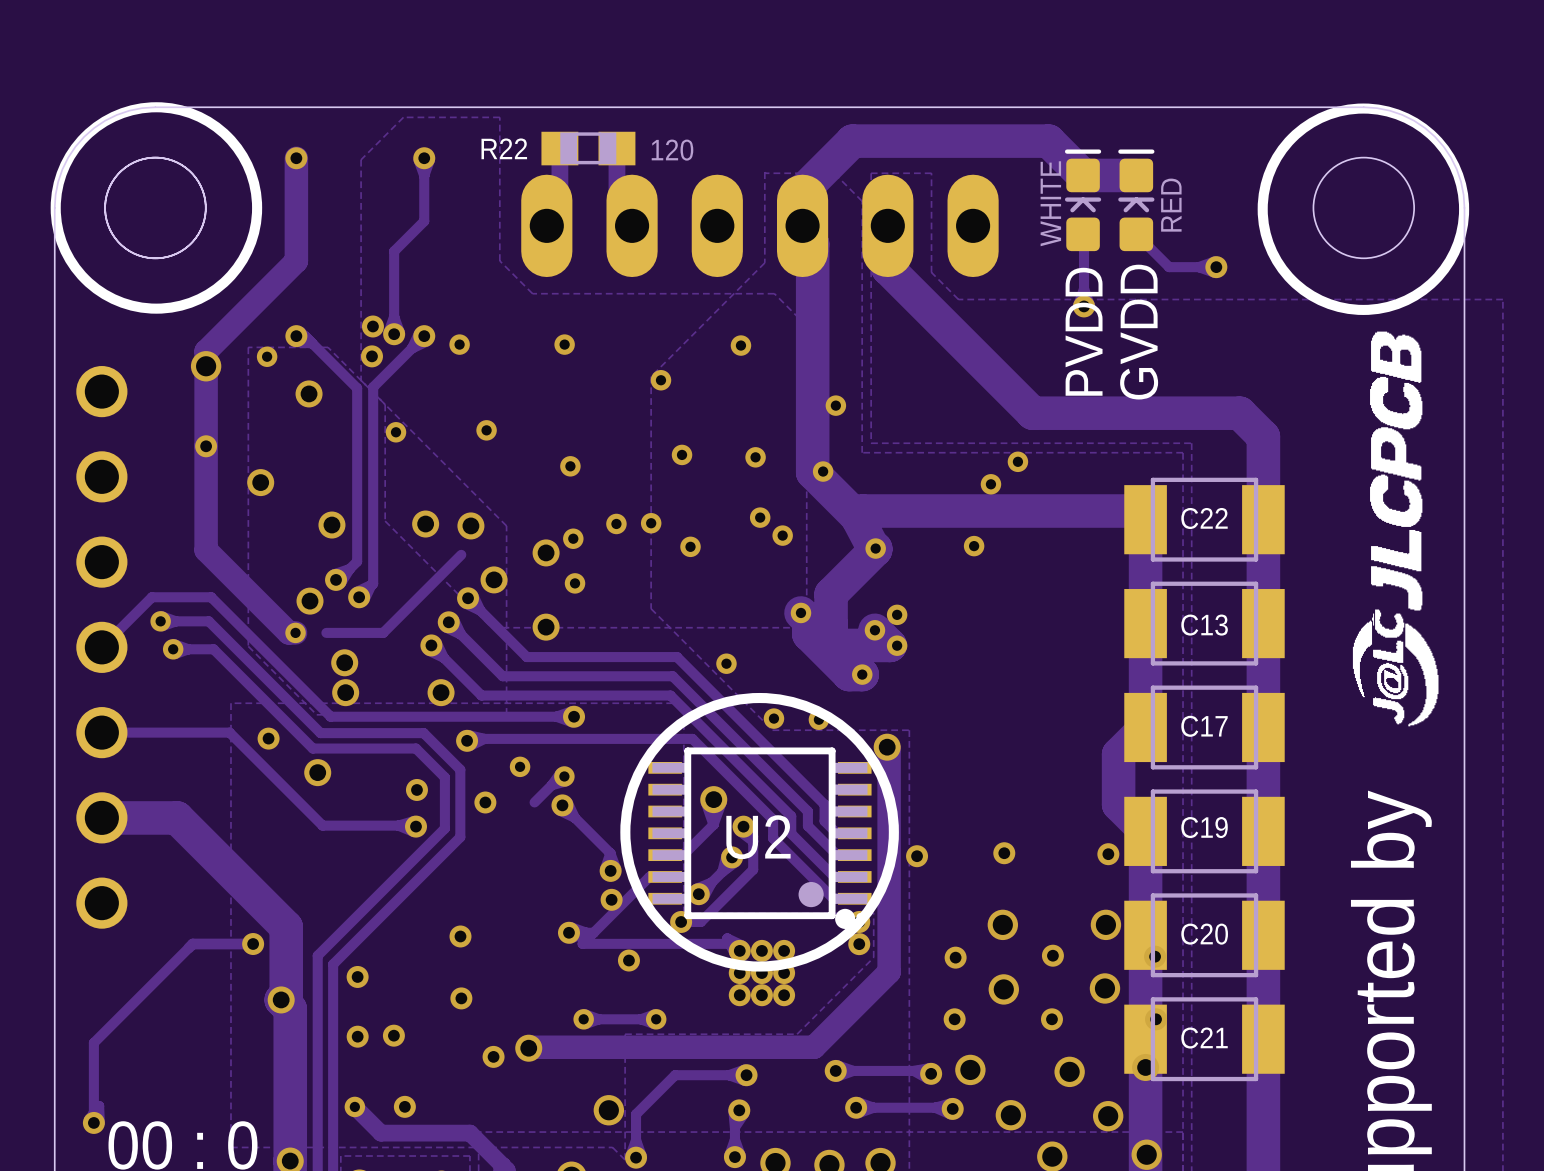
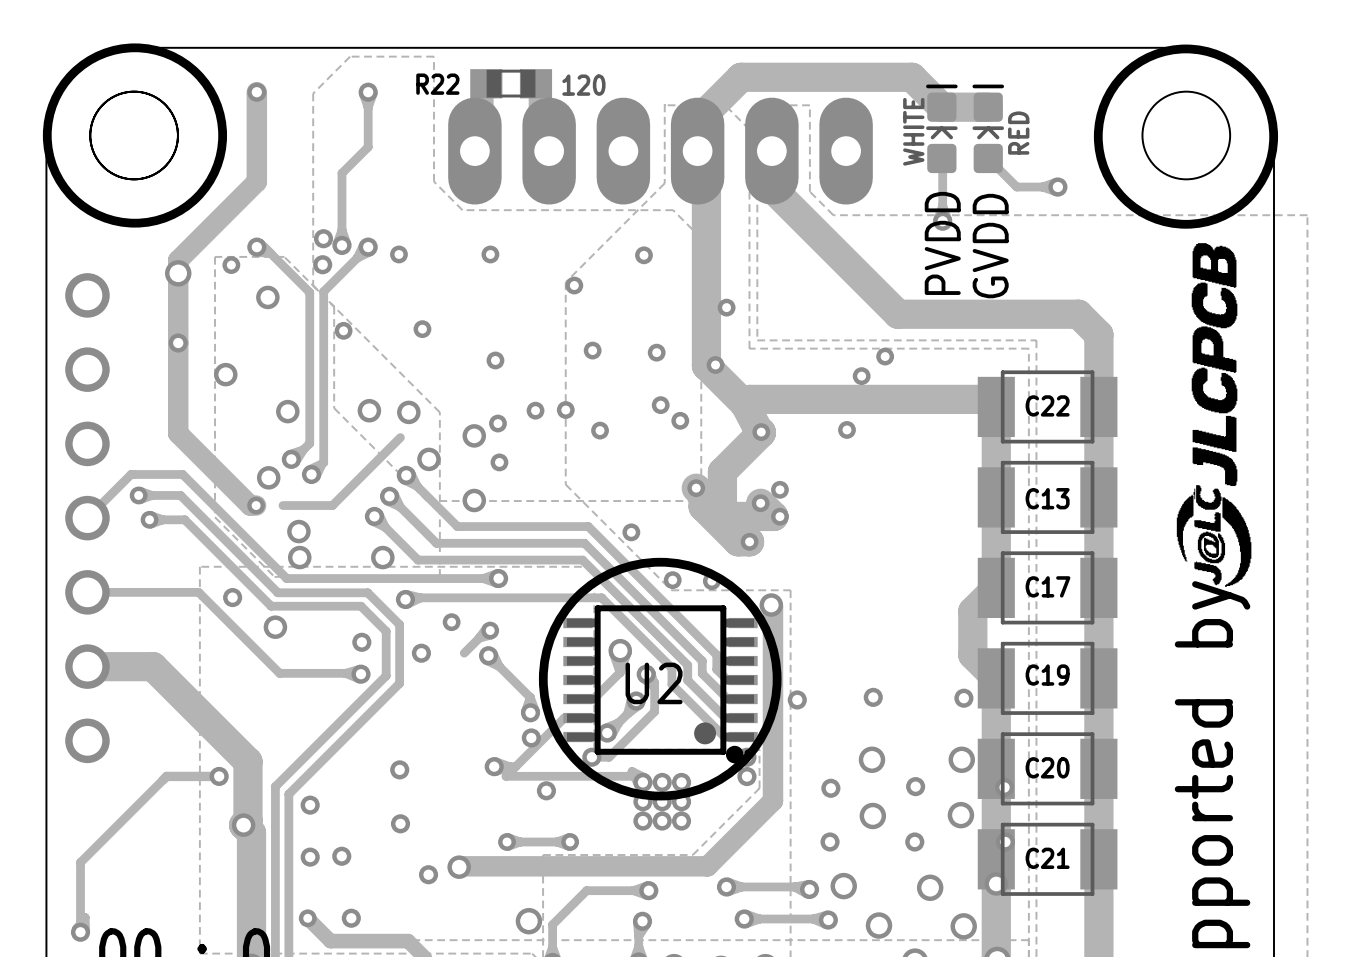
part footprint: [521, 174, 999, 278] -> [448, 97, 873, 205]

